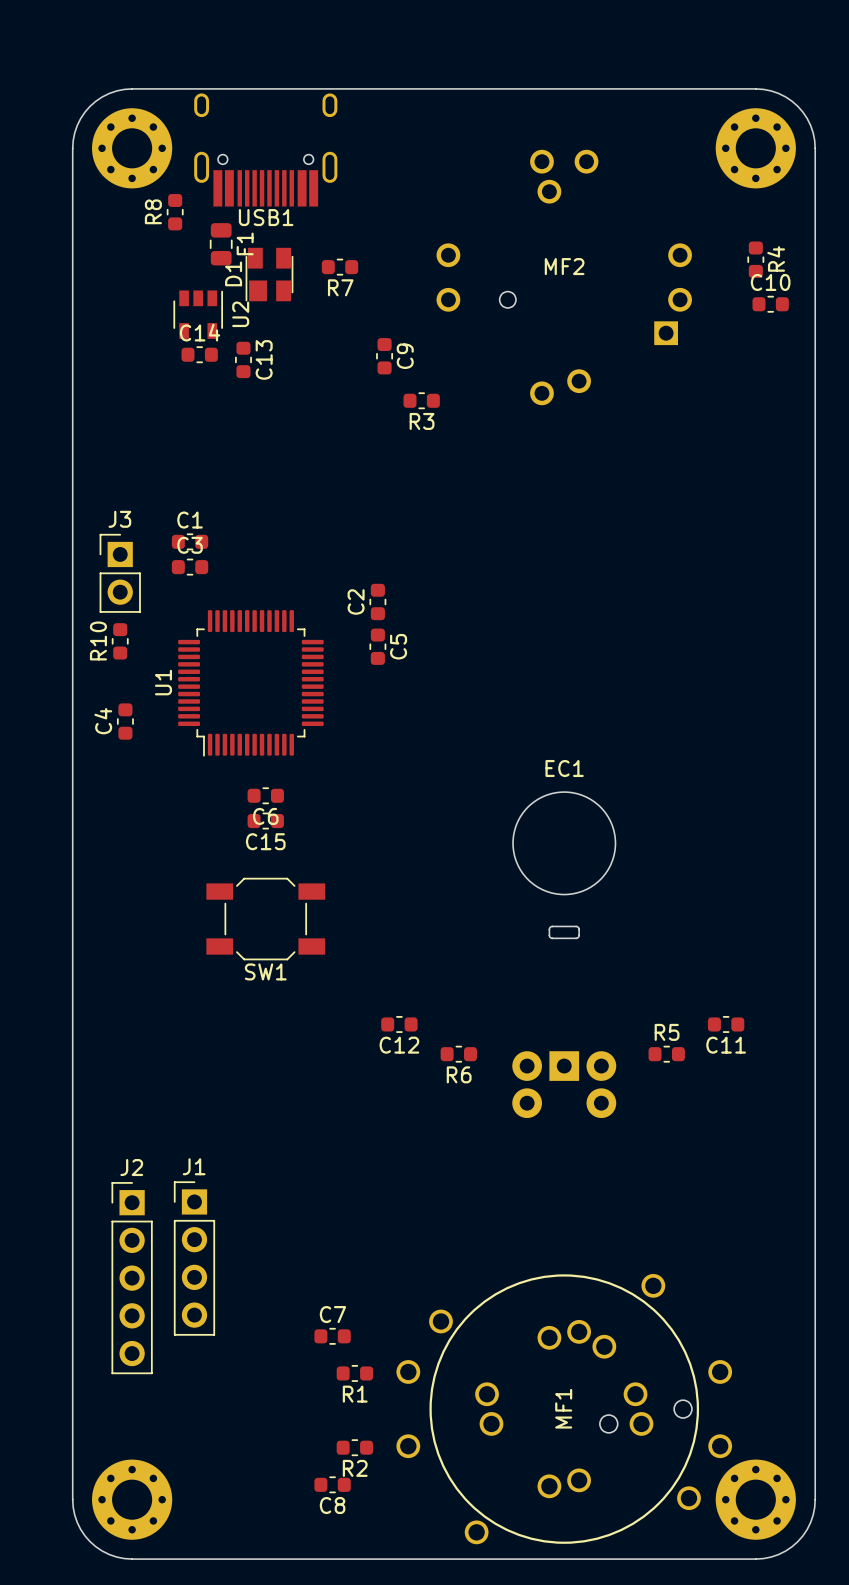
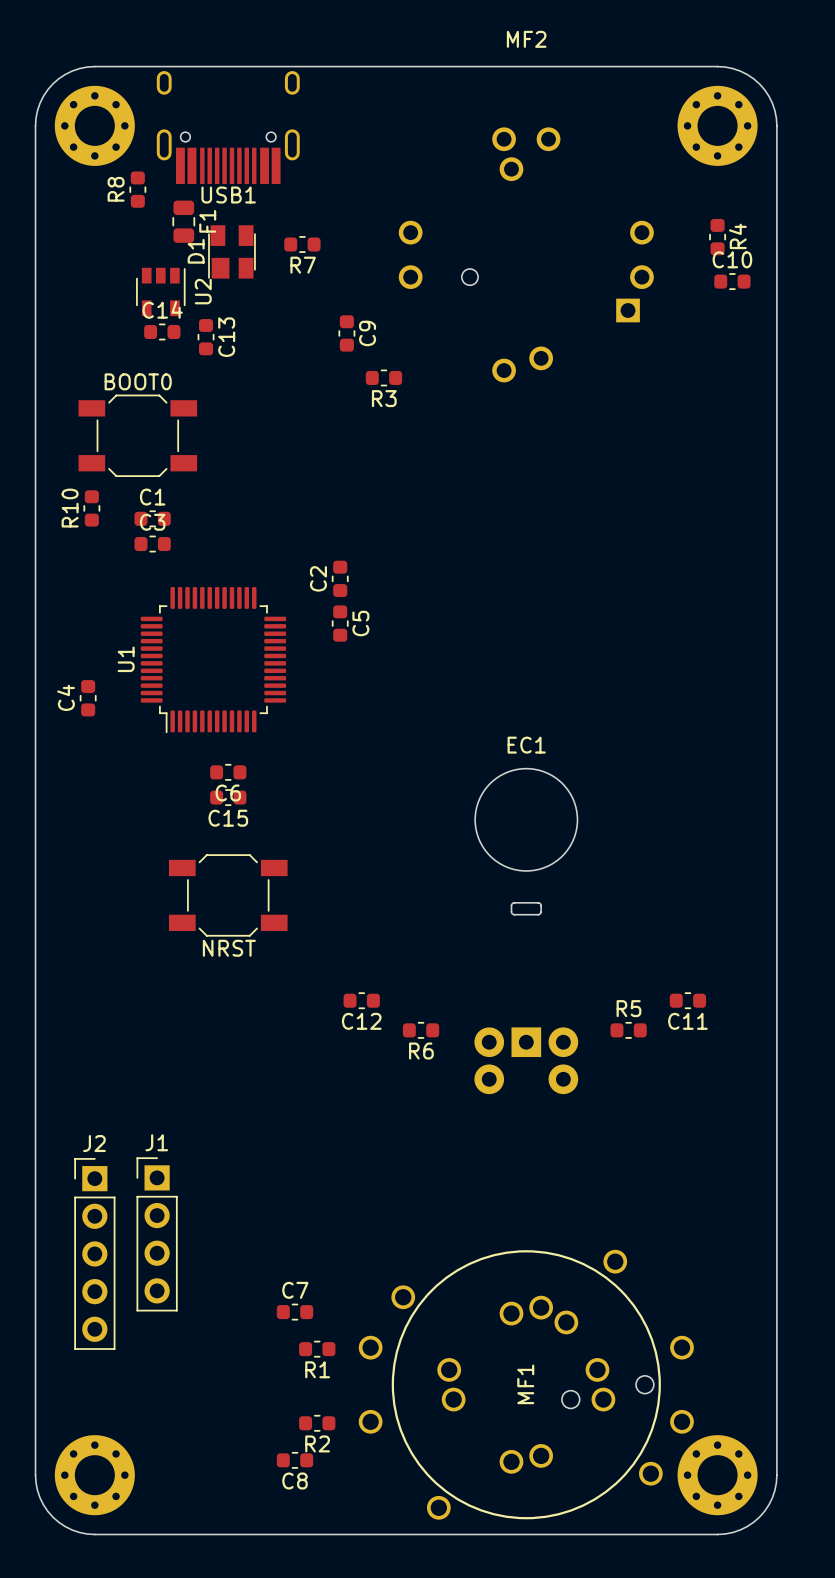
MF2 name position: MF2 (564, 266) -> MF2 (526, 39)
BOOT0: none -> (137, 435)
J3: (120, 573) -> none
R10 position: (120, 641) -> (91, 508)
SW1 name: SW1 (265, 971) -> NRST (229, 948)

